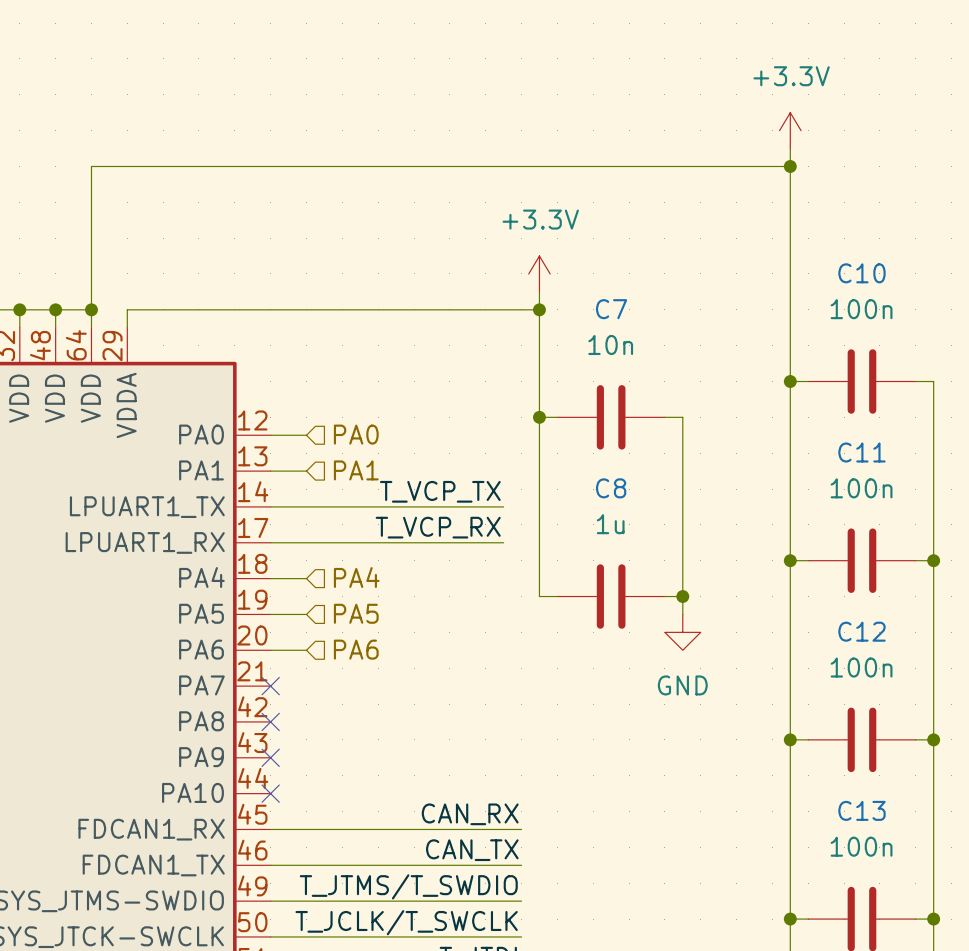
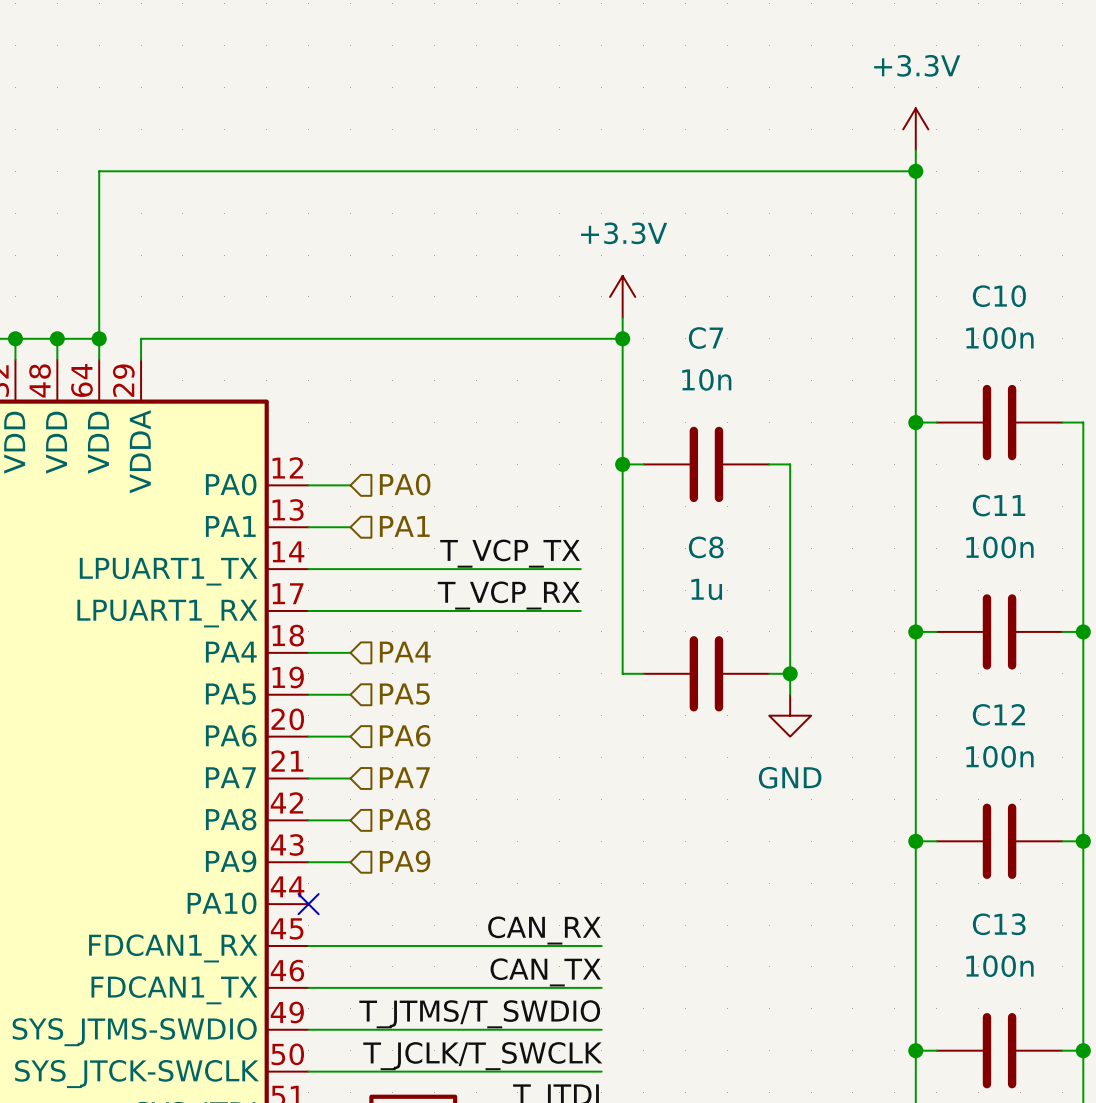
hierarchical label: none -> PA7 (404, 777)
wire: none -> (308, 778) (350, 778)
no-connect mark: (270, 686) -> none
wire: none -> (308, 820) (350, 820)
no-connect mark: (270, 721) -> none
hierarchical label: none -> PA8 (405, 819)
wire: none -> (308, 862) (350, 862)
no-connect mark: (270, 757) -> none
hierarchical label: none -> PA9 (405, 861)

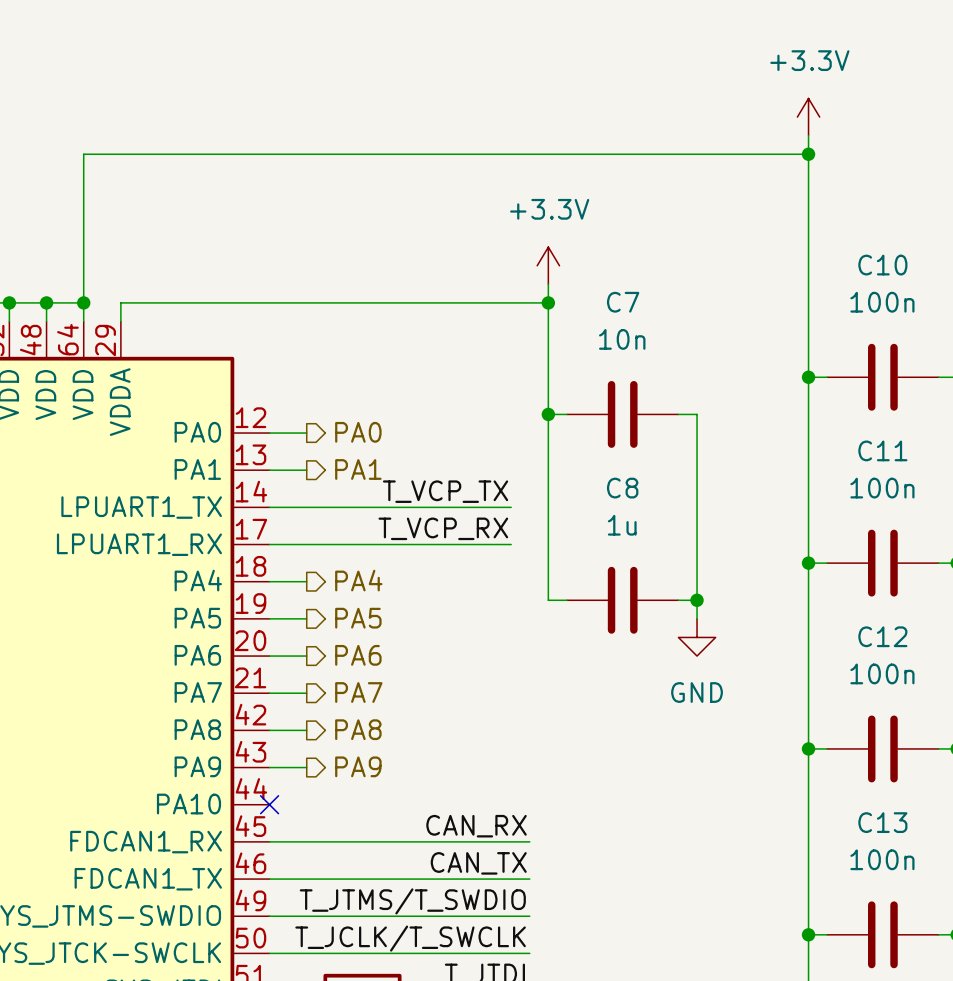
hierarchical label shape: input (405, 484) -> output (358, 432)
hierarchical label shape: input (404, 526) -> output (358, 469)
hierarchical label shape: input (405, 652) -> output (358, 580)
hierarchical label shape: input (404, 694) -> output (358, 618)
hierarchical label shape: input (405, 735) -> output (358, 655)
hierarchical label shape: input (404, 777) -> output (358, 692)
hierarchical label shape: input (405, 819) -> output (358, 729)
hierarchical label shape: input (405, 861) -> output (358, 766)

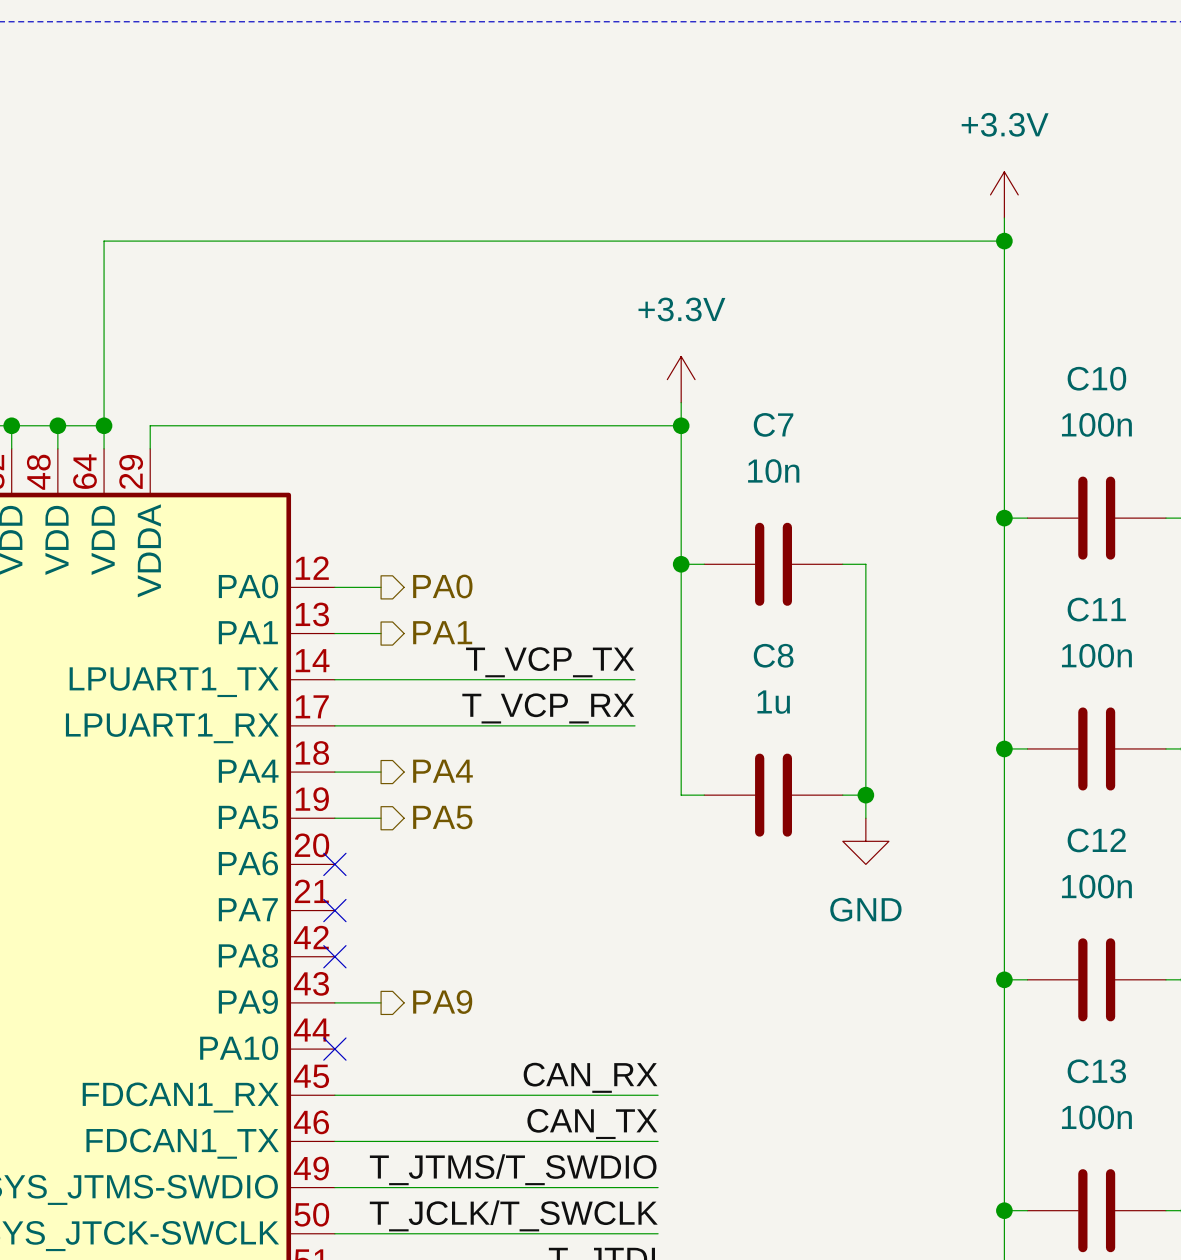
hierarchical label: PA6 (358, 655) -> none
wire: (269, 656) (306, 656) -> none
no-connect mark: none -> (334, 864)
hierarchical label: PA7 (358, 692) -> none
wire: (269, 693) (306, 693) -> none
no-connect mark: none -> (334, 910)
hierarchical label: PA8 (358, 729) -> none
wire: (269, 730) (306, 730) -> none
no-connect mark: none -> (334, 956)

